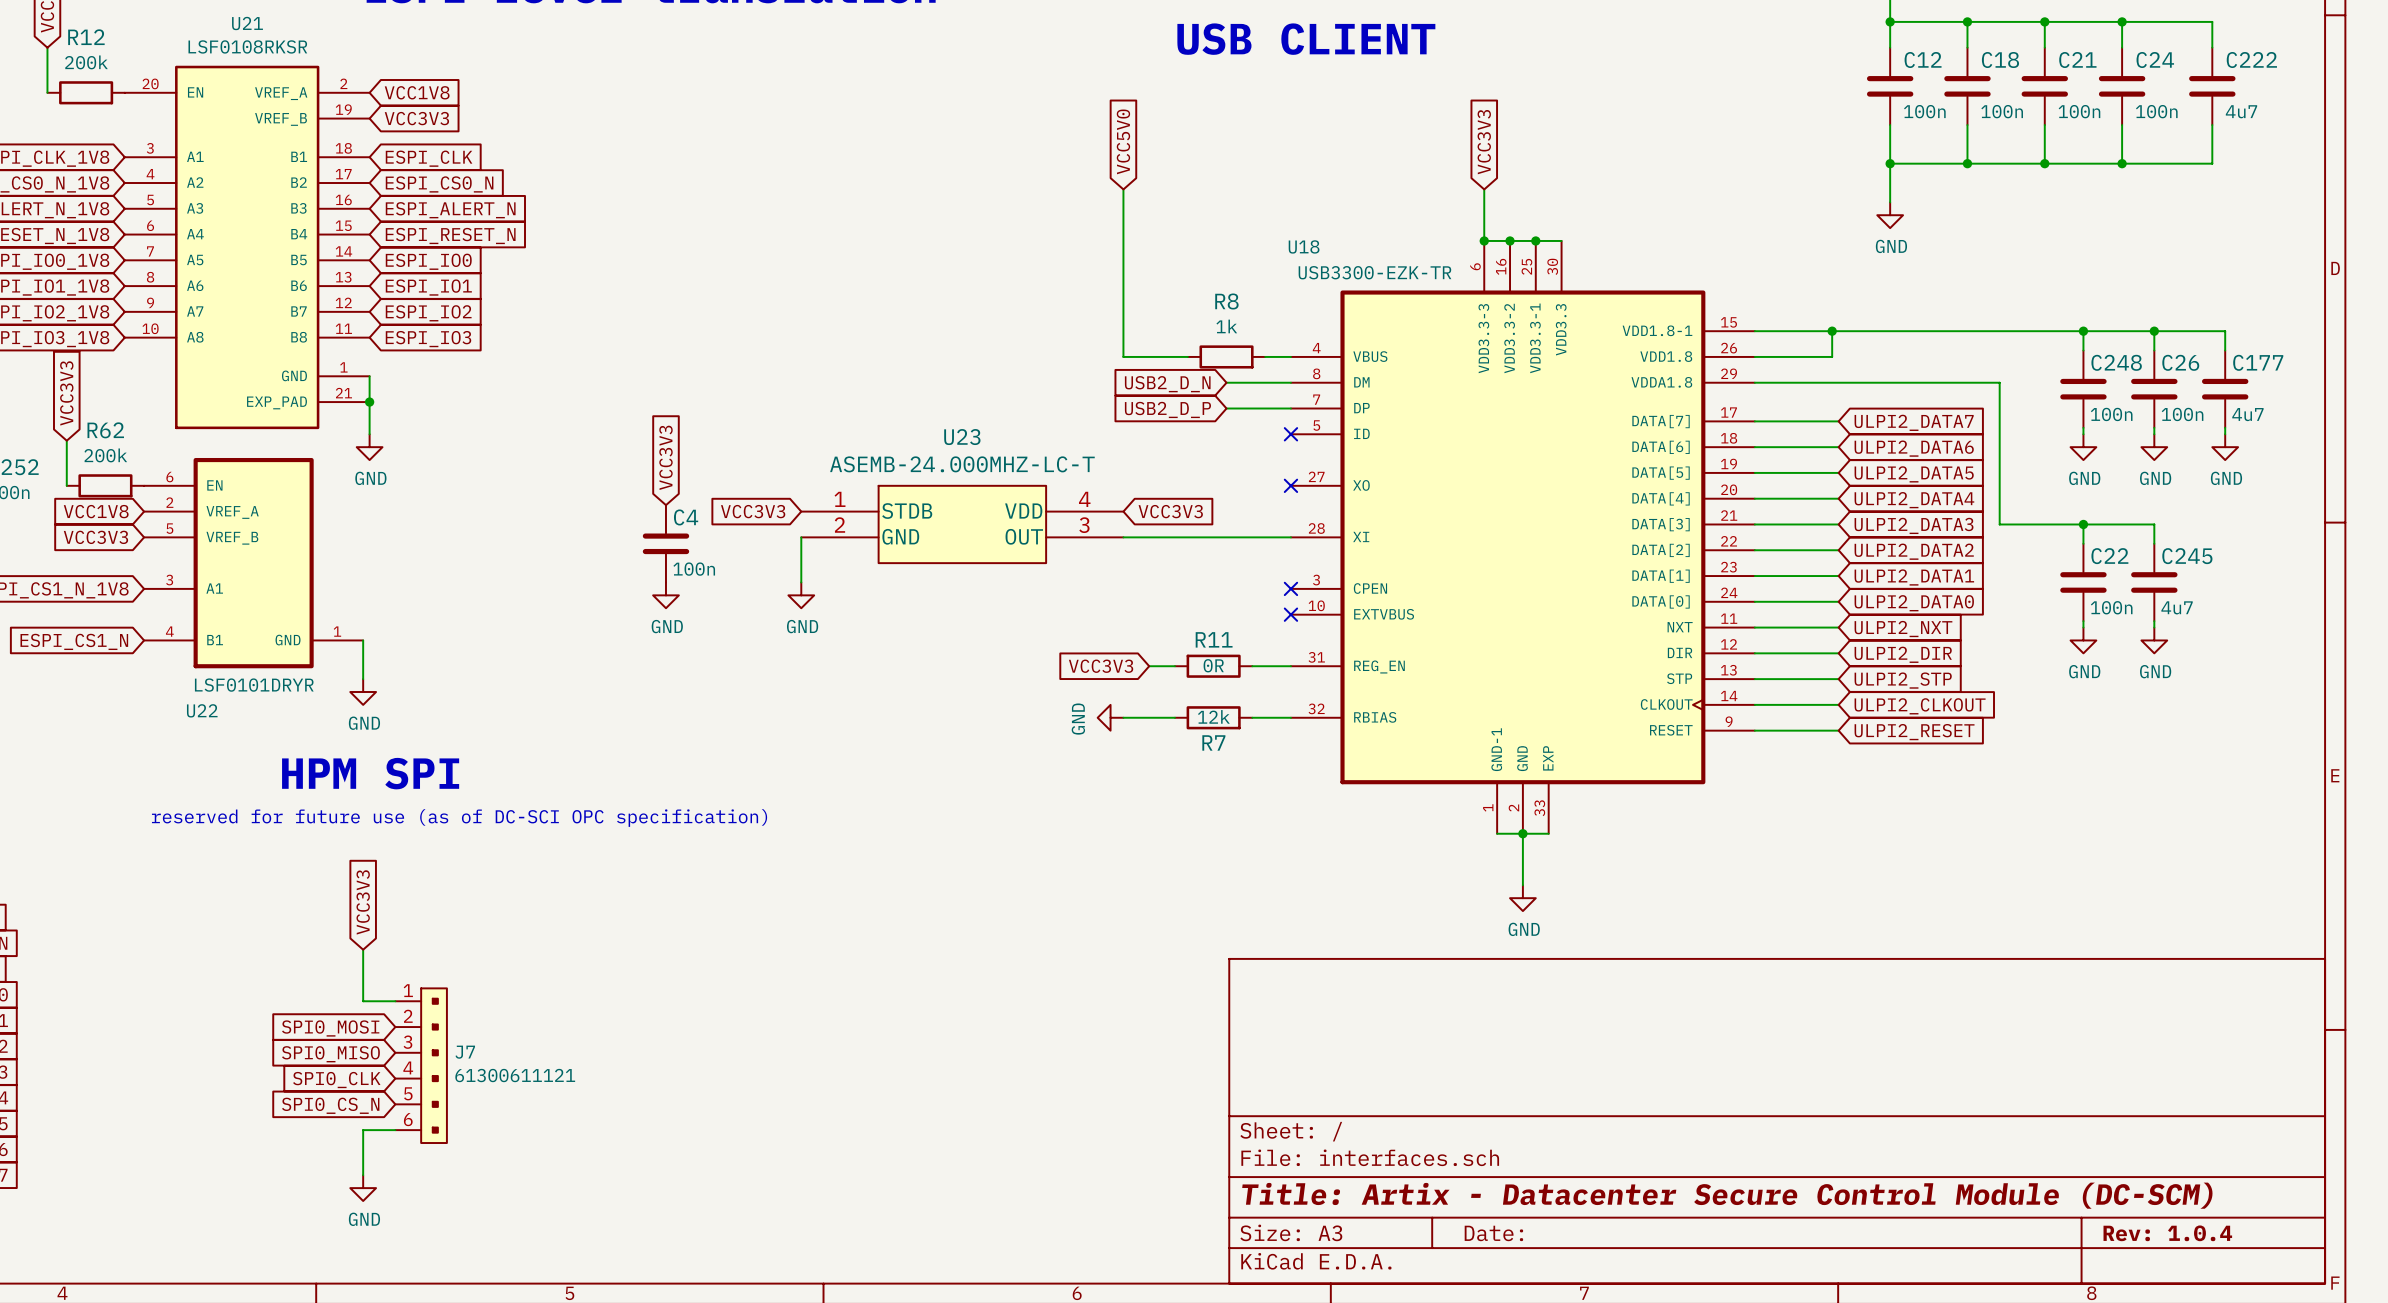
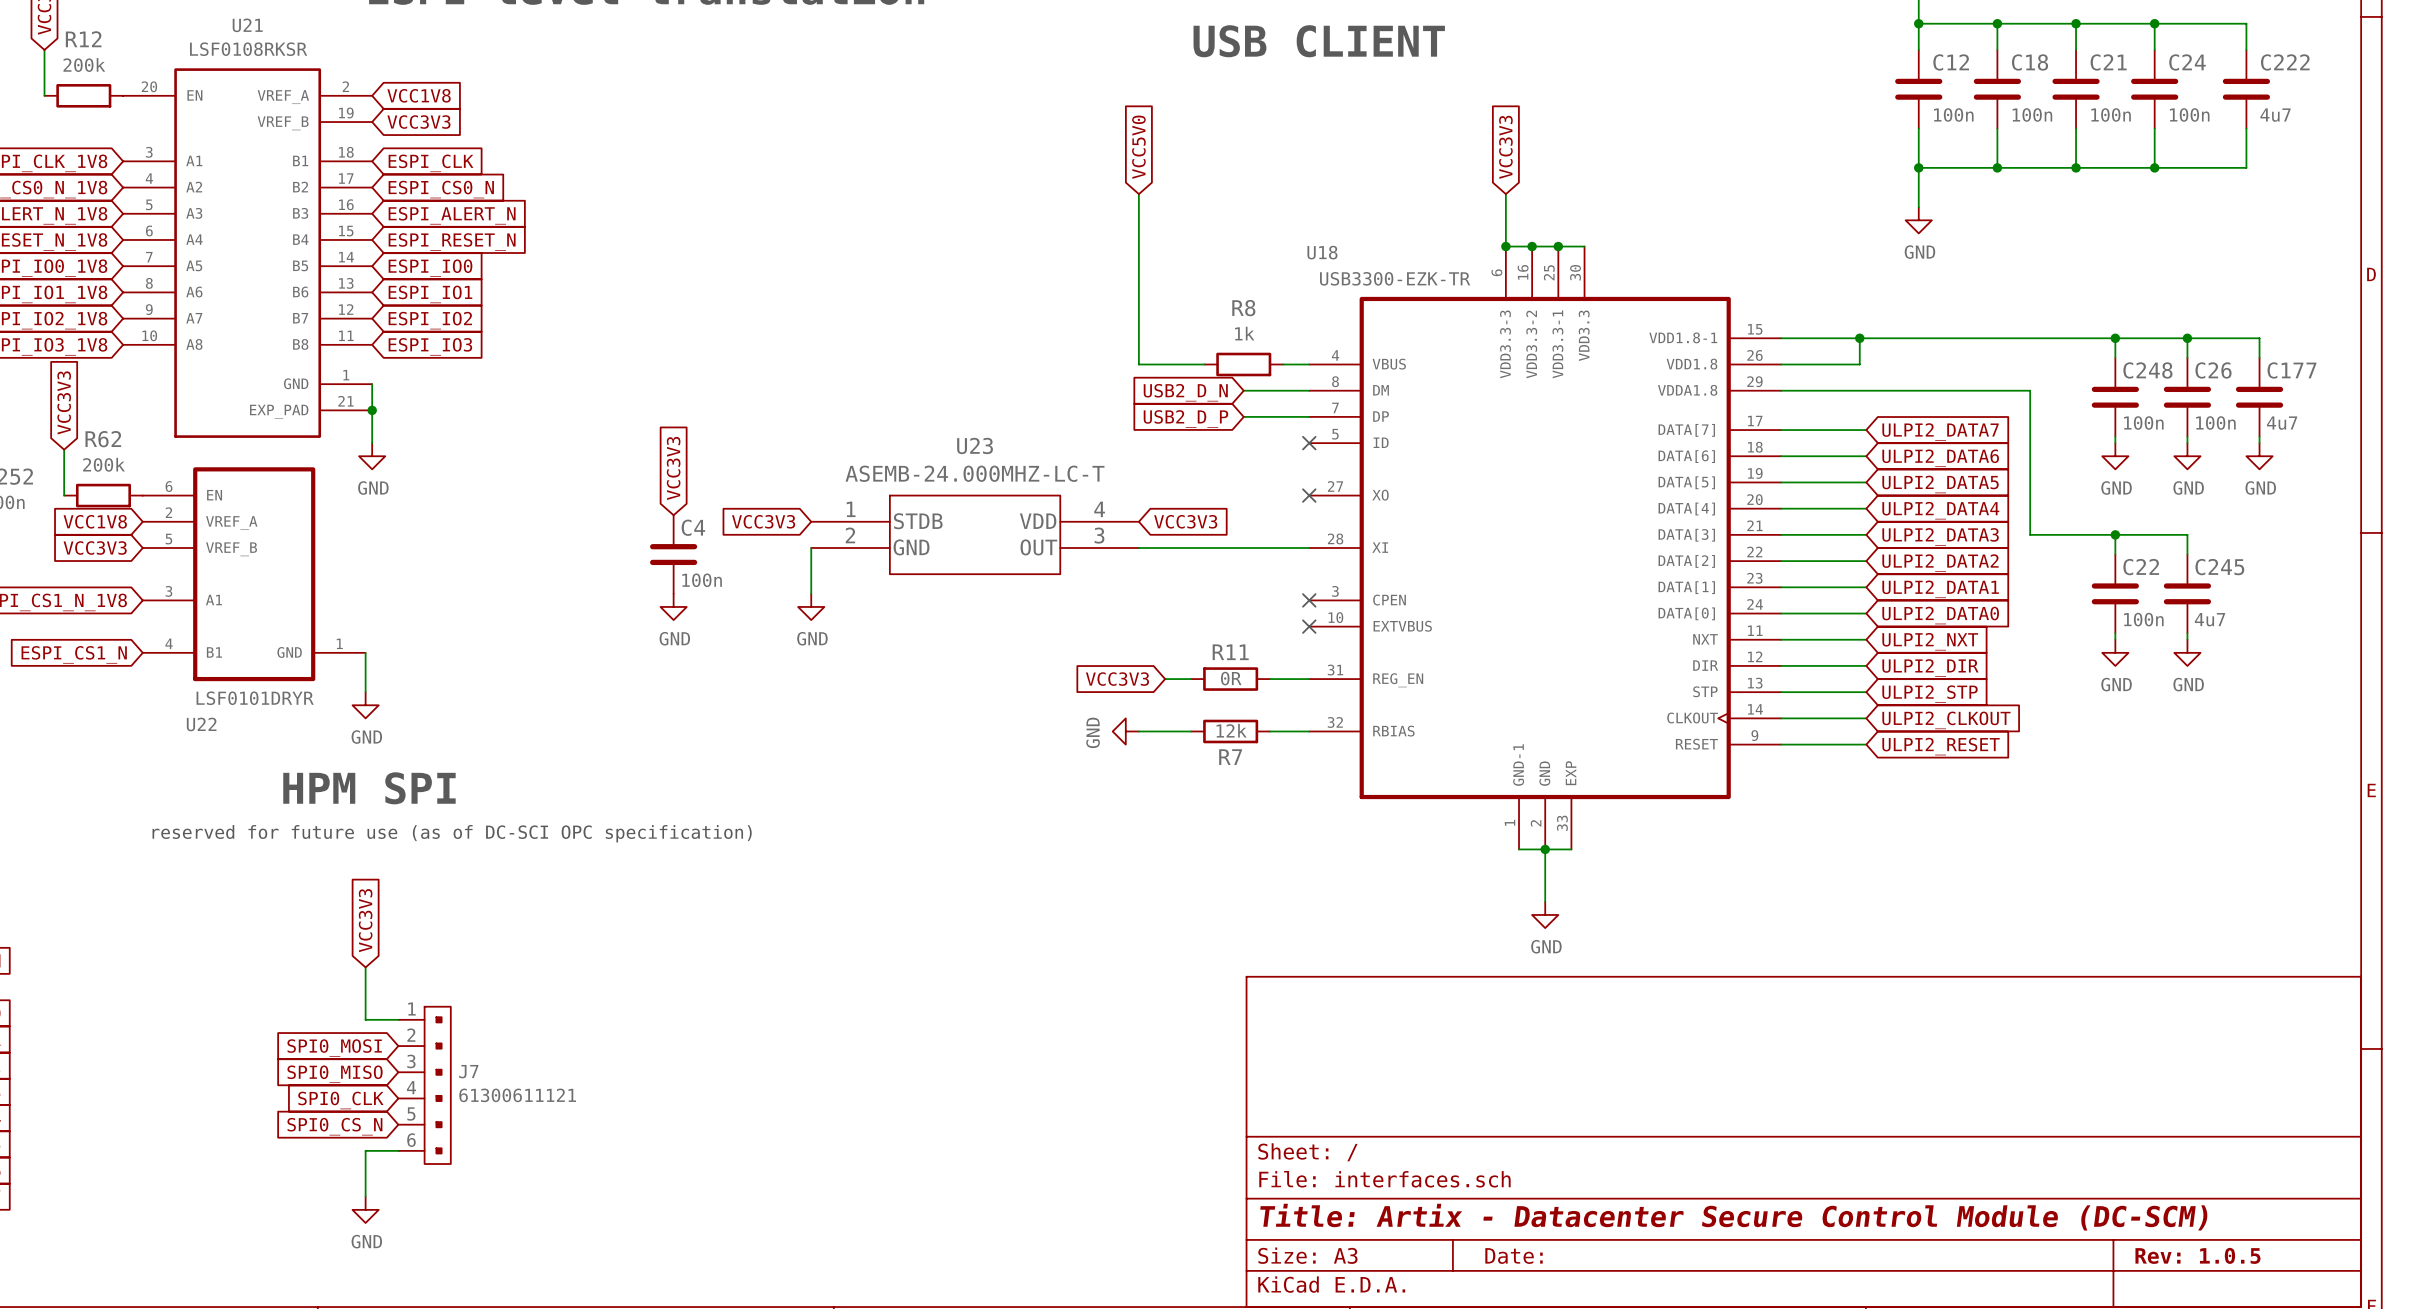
title block: Rev: 1.0.4 (2167, 1233) -> Rev: 1.0.5 (2197, 1255)

